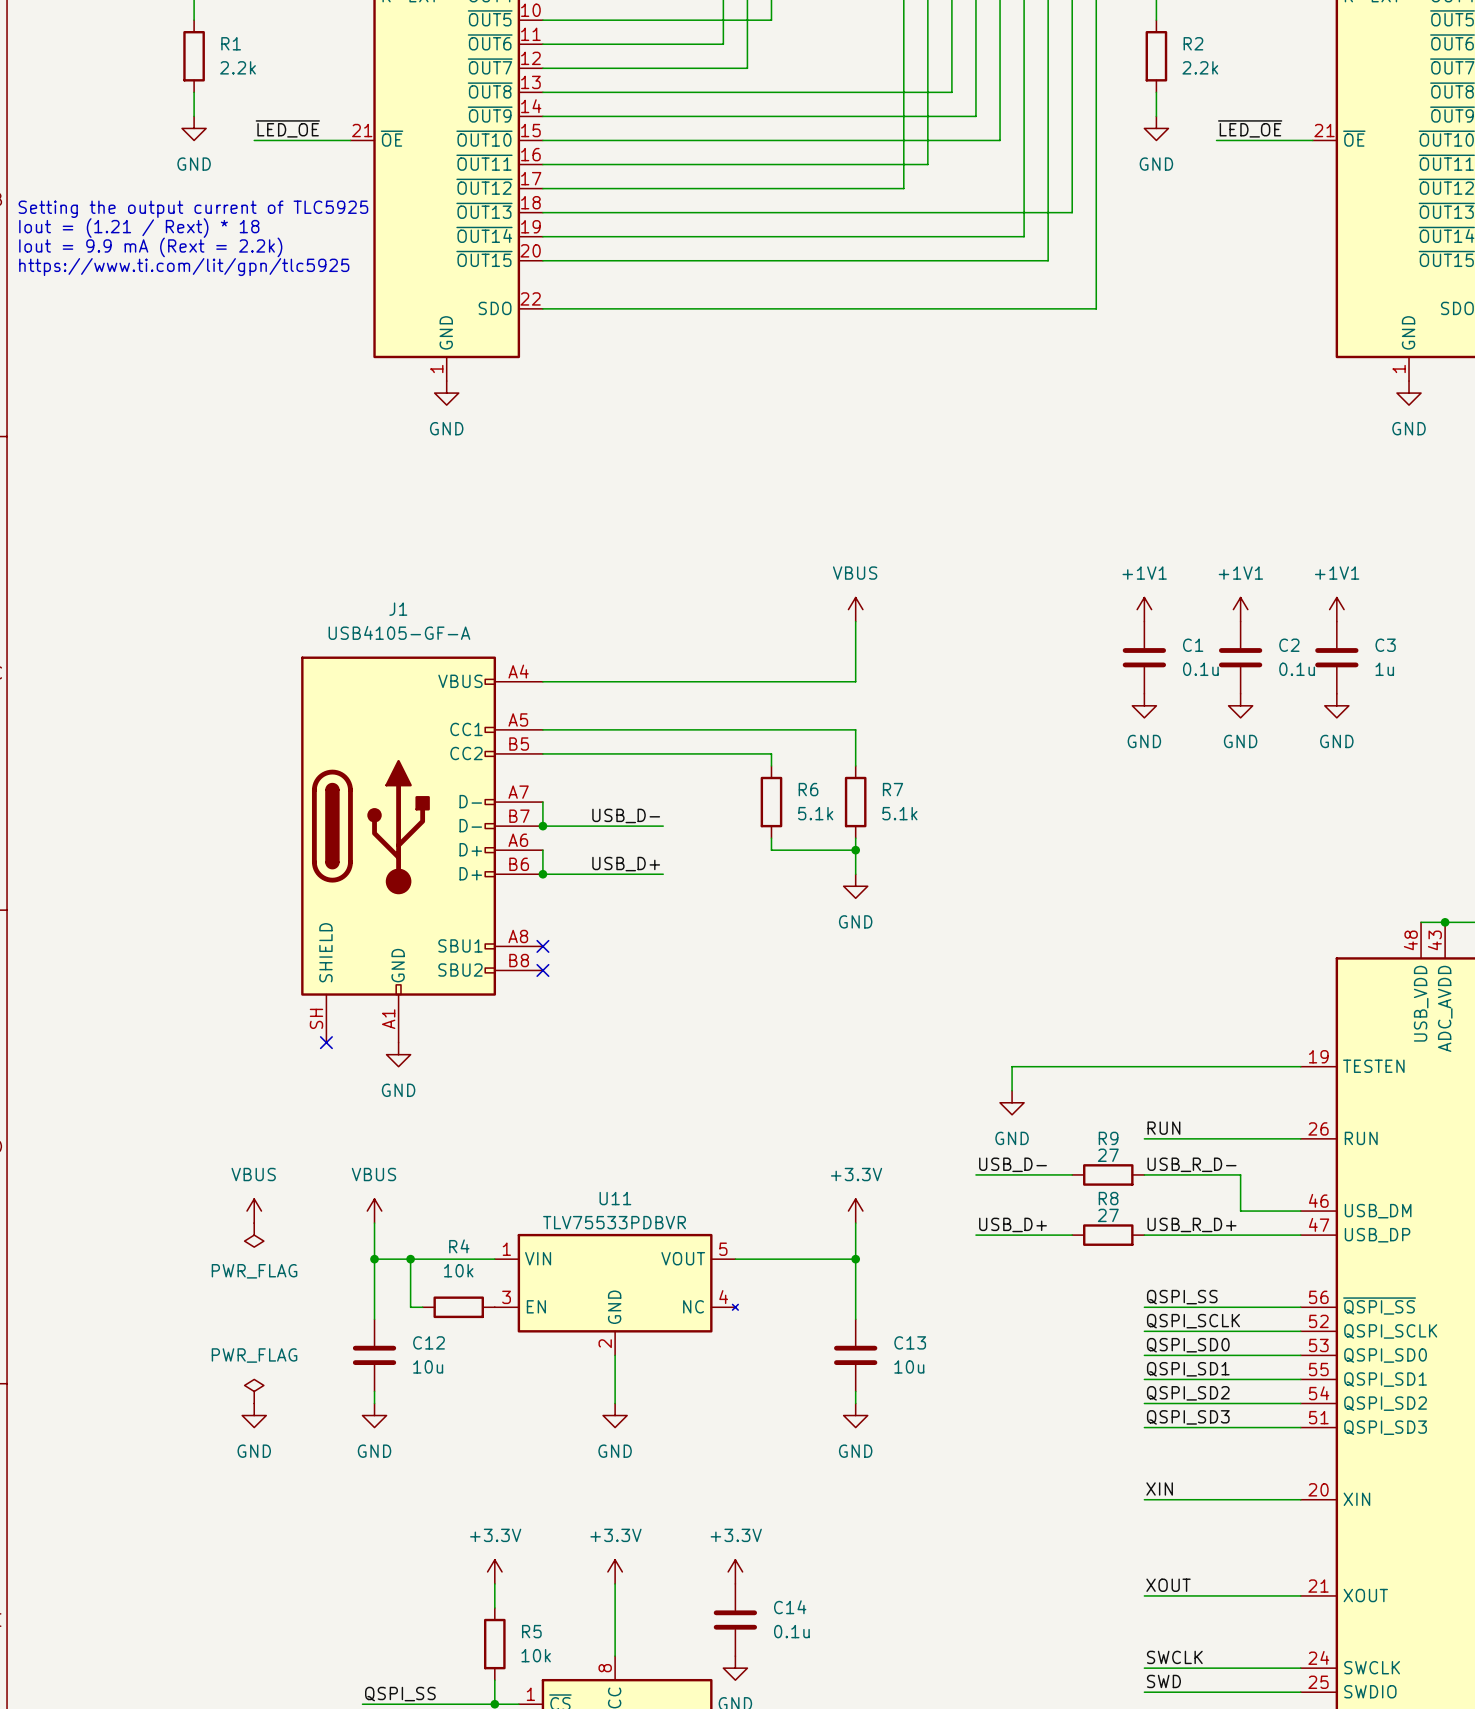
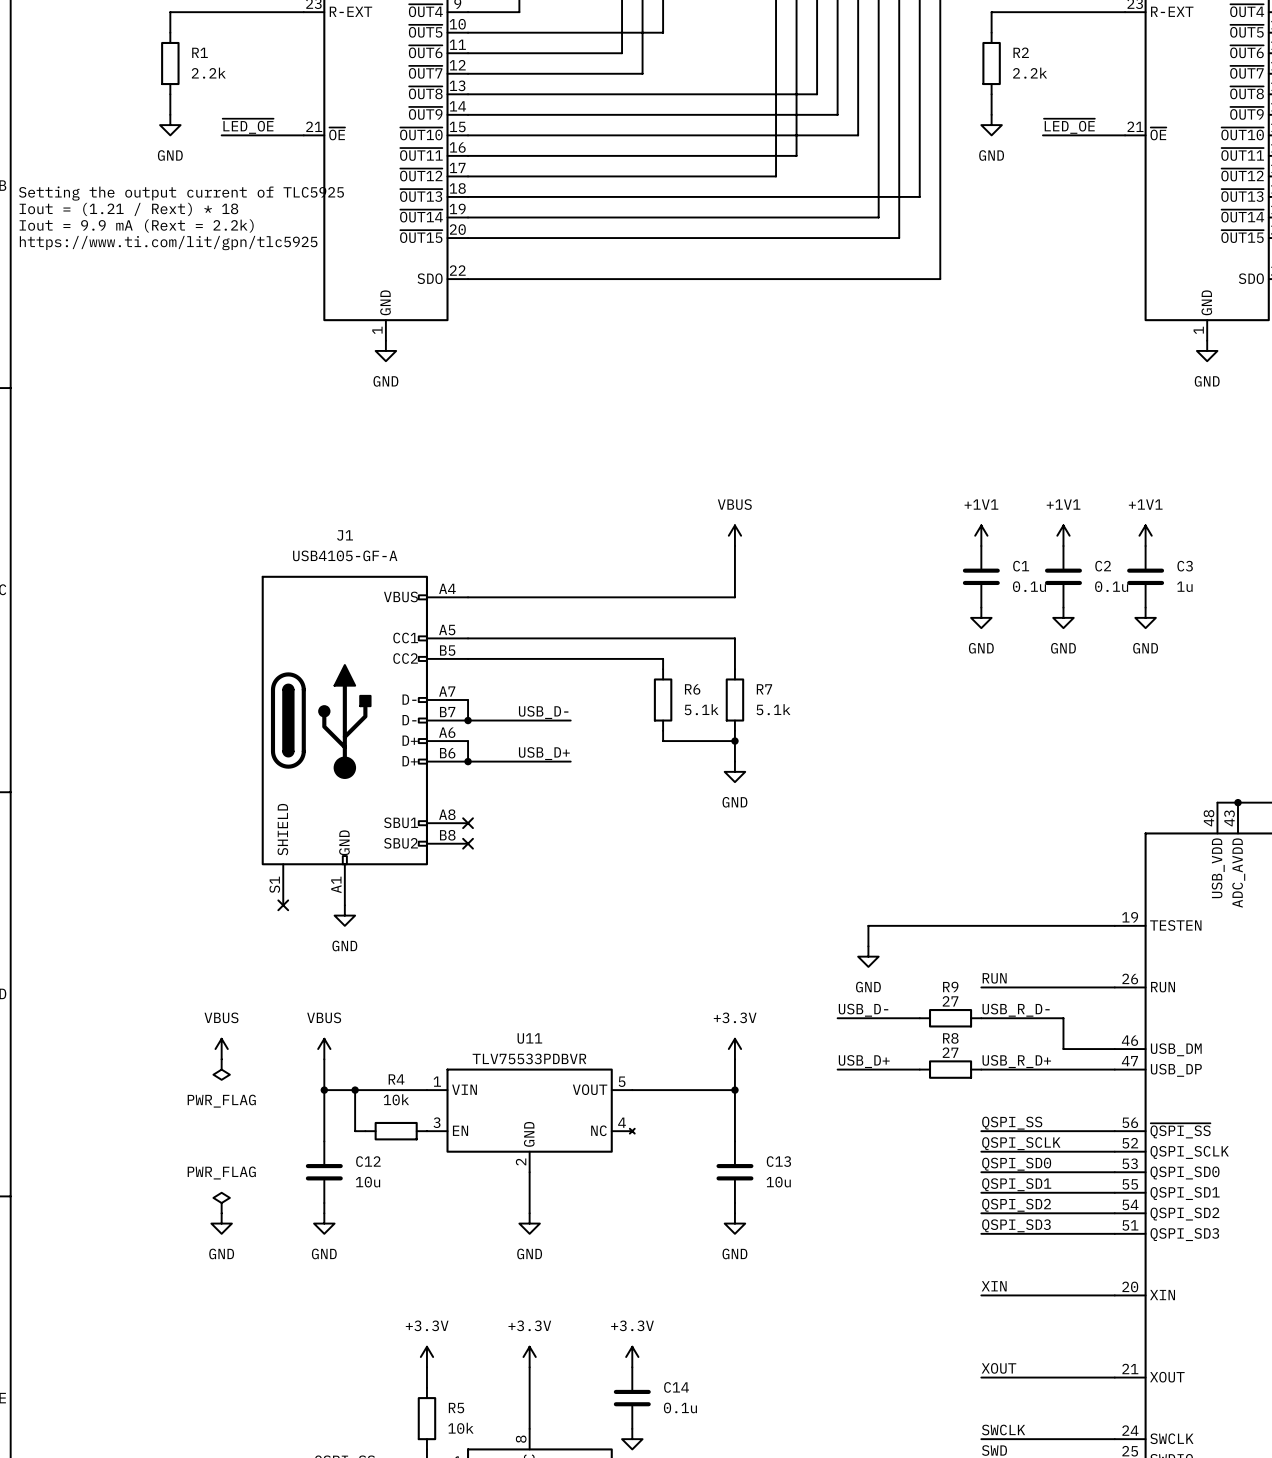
J1 pin number: SH (316, 1018) -> S1 (274, 884)

